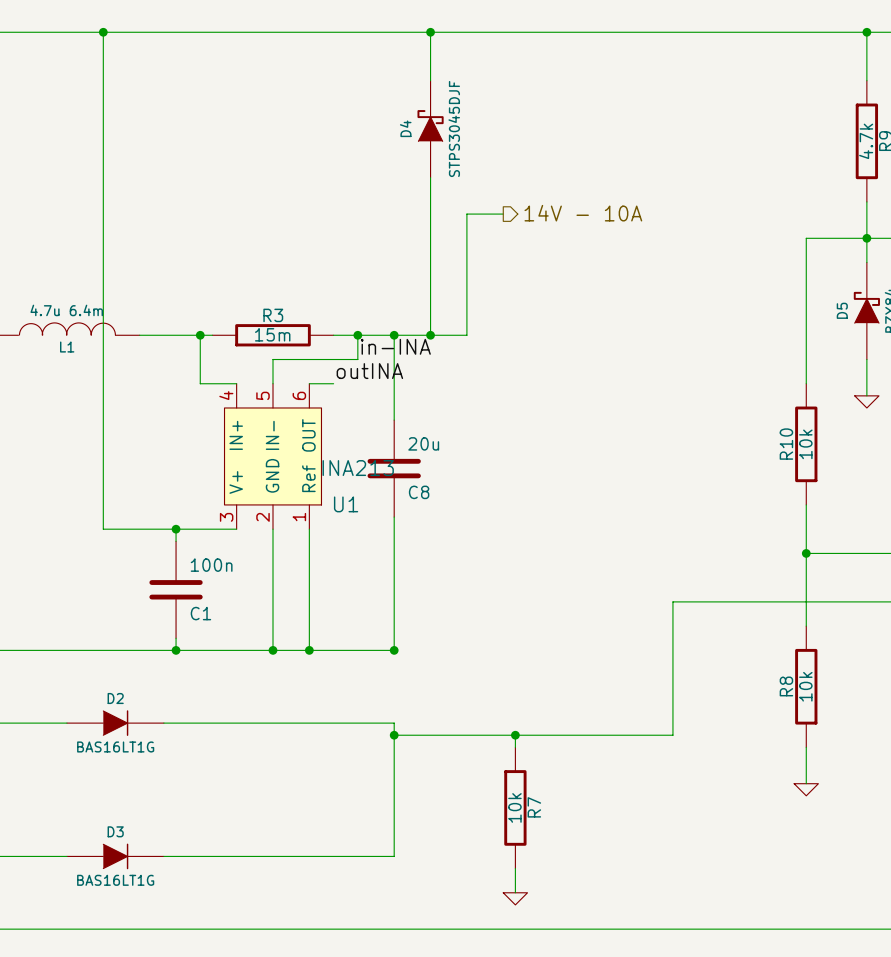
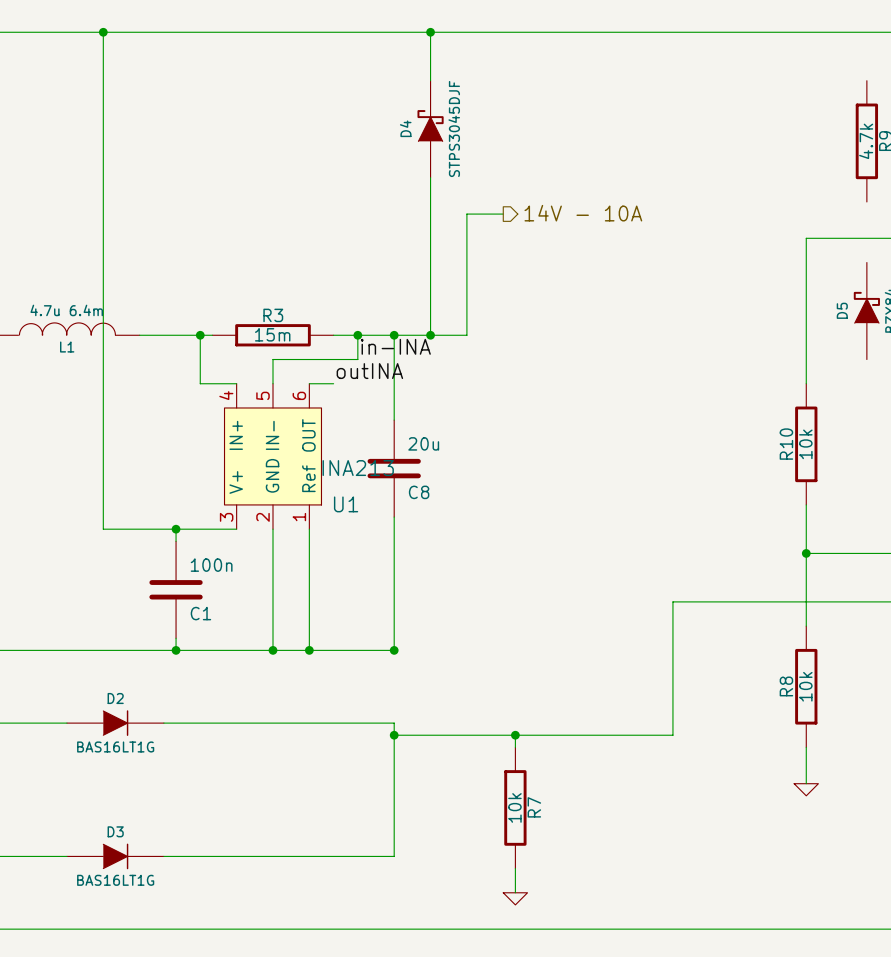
wire: (866, 32) (866, 80) -> none
junction: (866, 32) -> none
wire: (866, 201) (866, 262) -> none
junction: (866, 238) -> none
wire: (866, 359) (866, 395) -> none
power symbol: (866, 401) -> none

